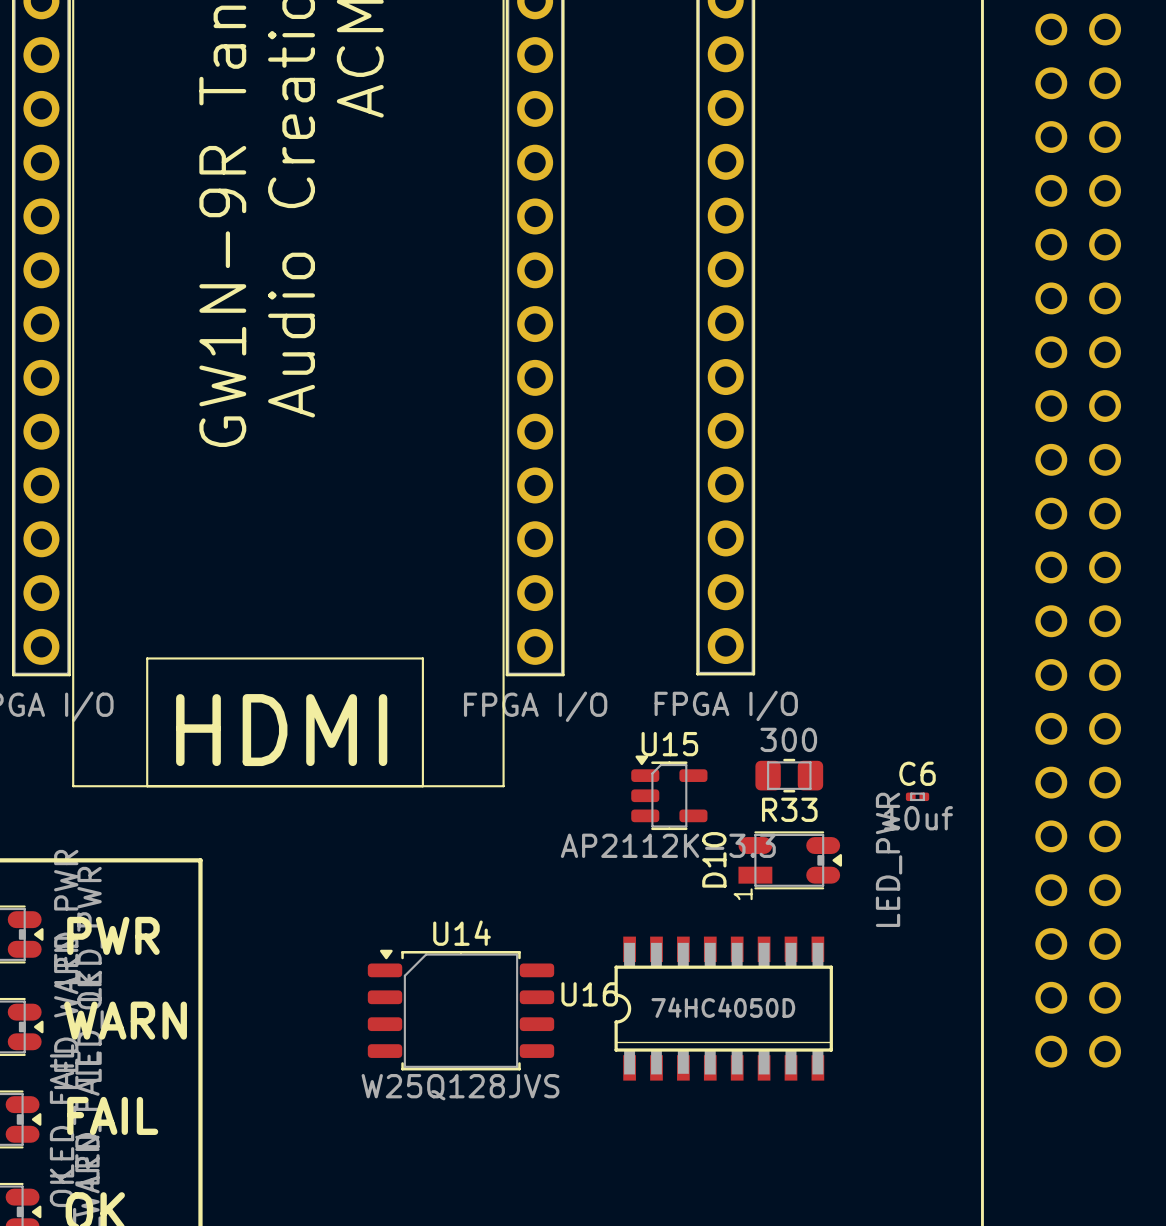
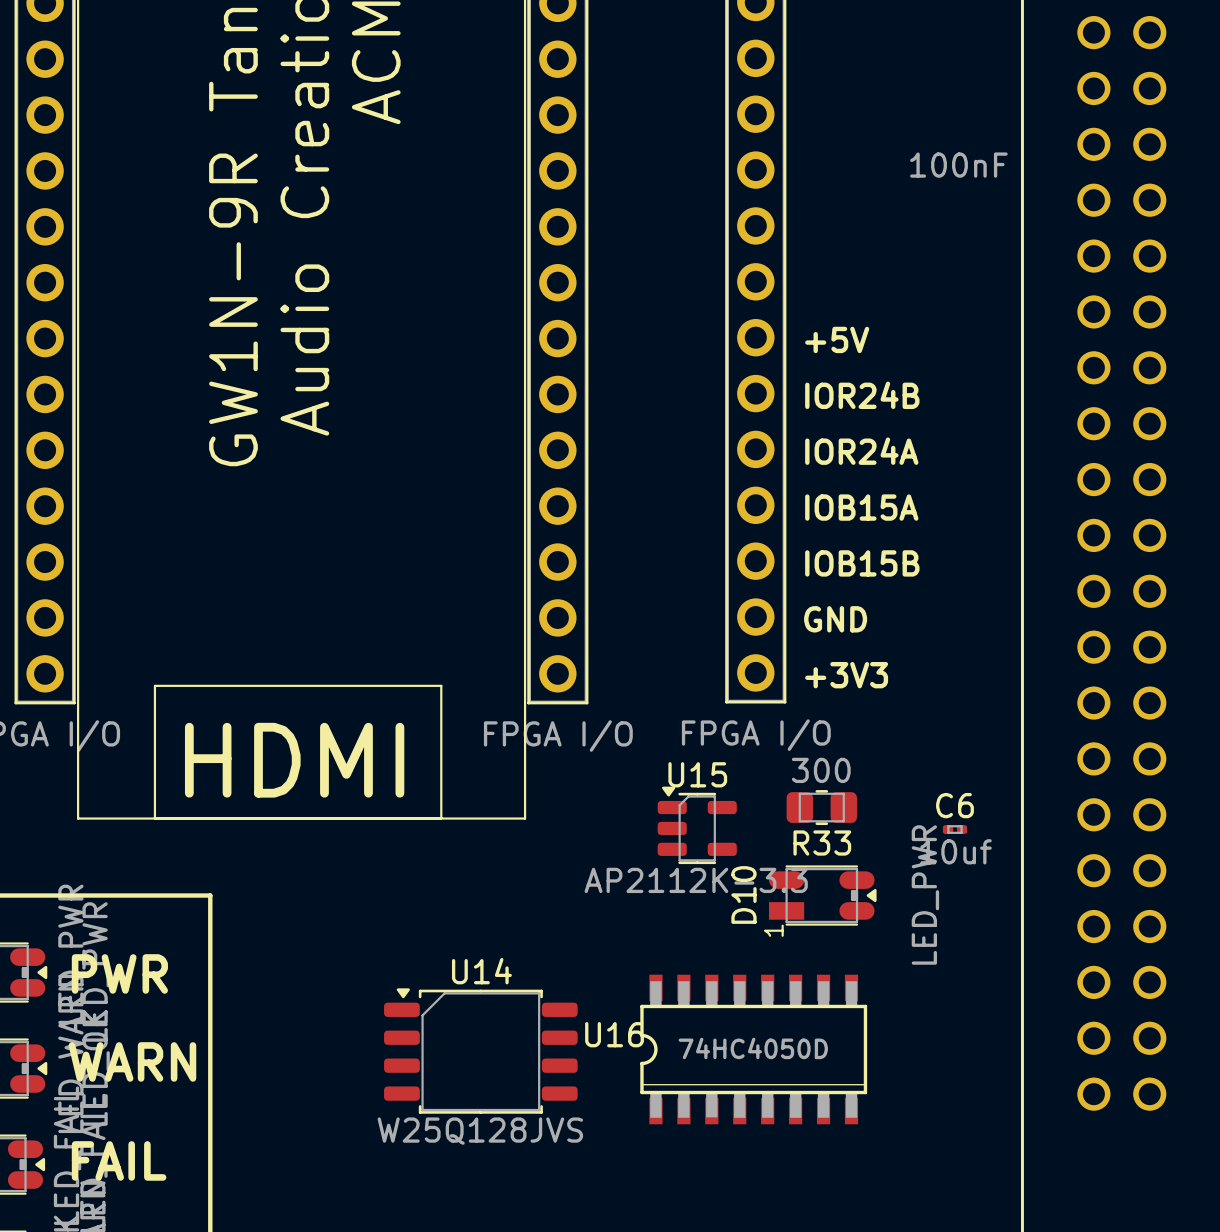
text: none -> 100nF (958, 165)
text: none -> +5V (837, 339)
text: none -> IOR24B (862, 395)
text: none -> IOR24A (861, 451)
text: none -> IOB15A (861, 507)
text: none -> IOB15B (862, 563)
text: none -> GND (835, 619)
text: none -> +3V3 (846, 675)

